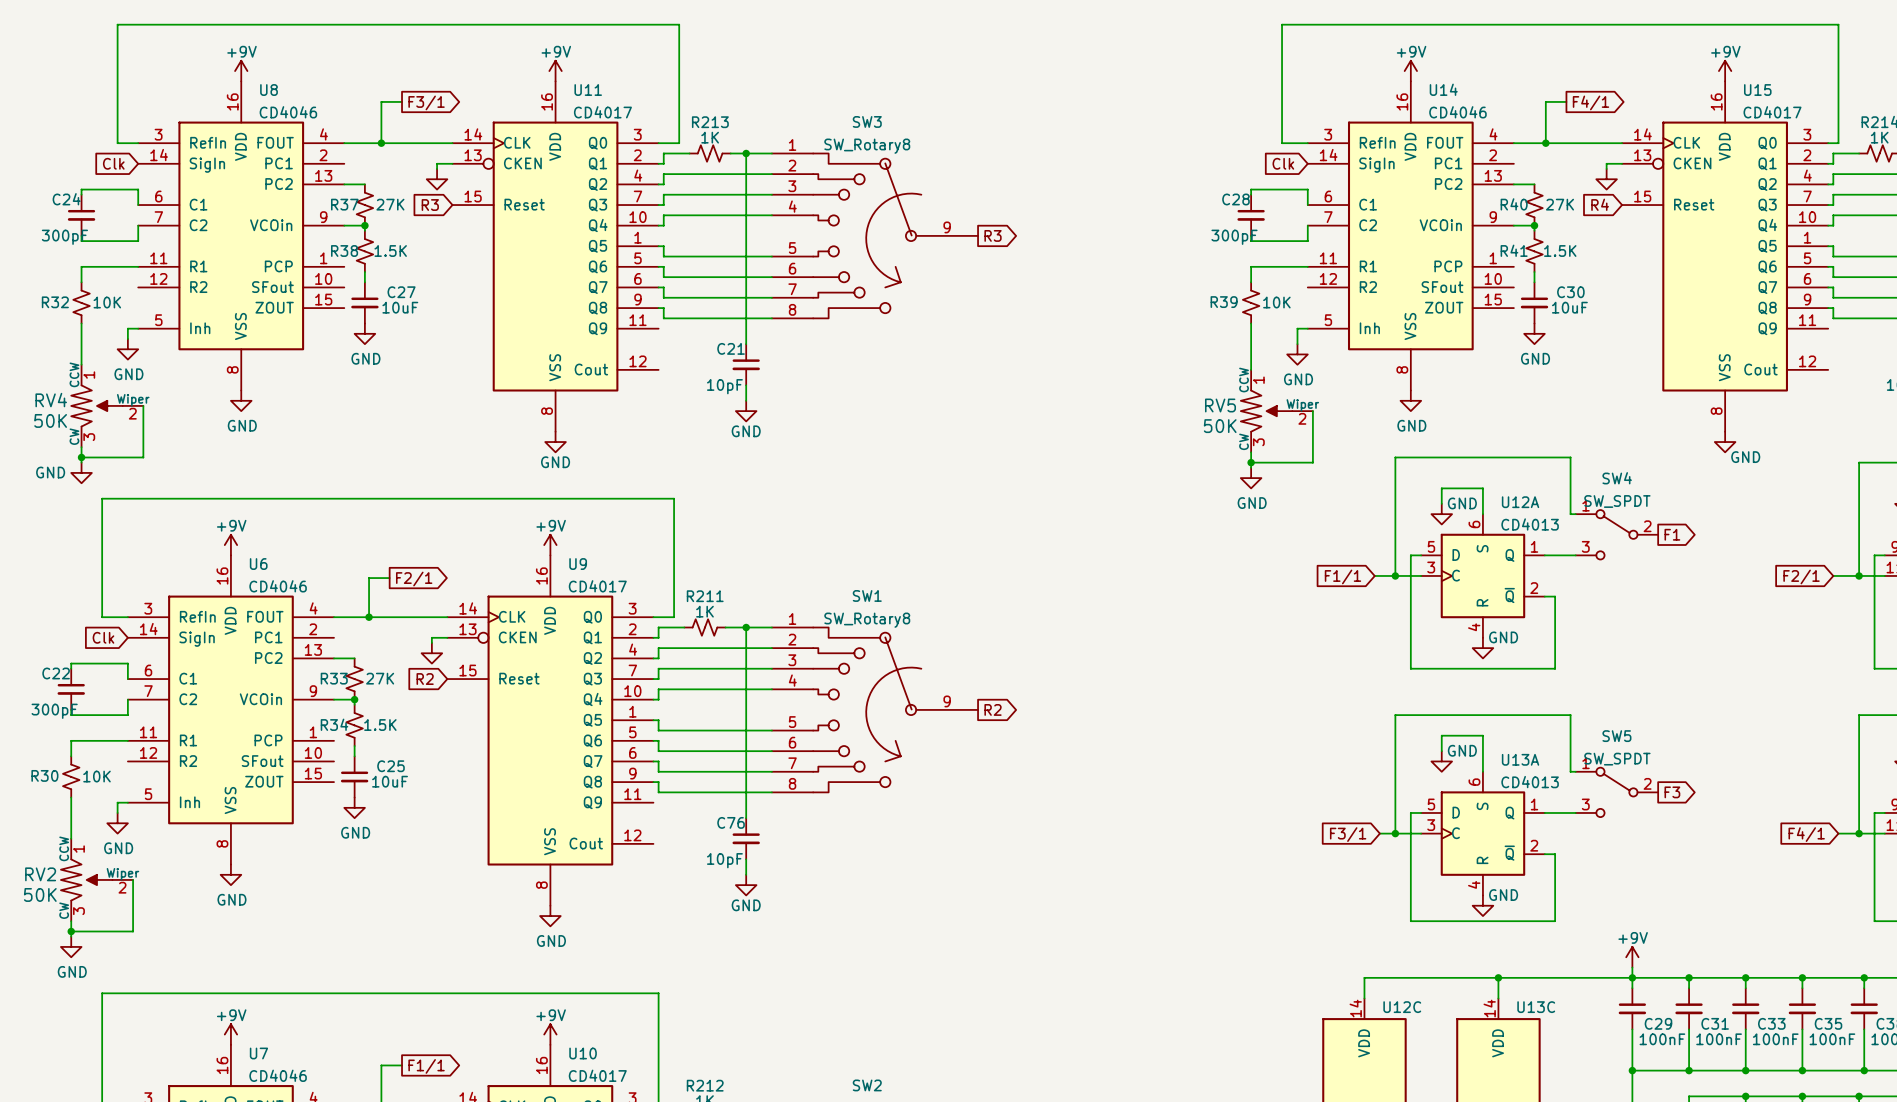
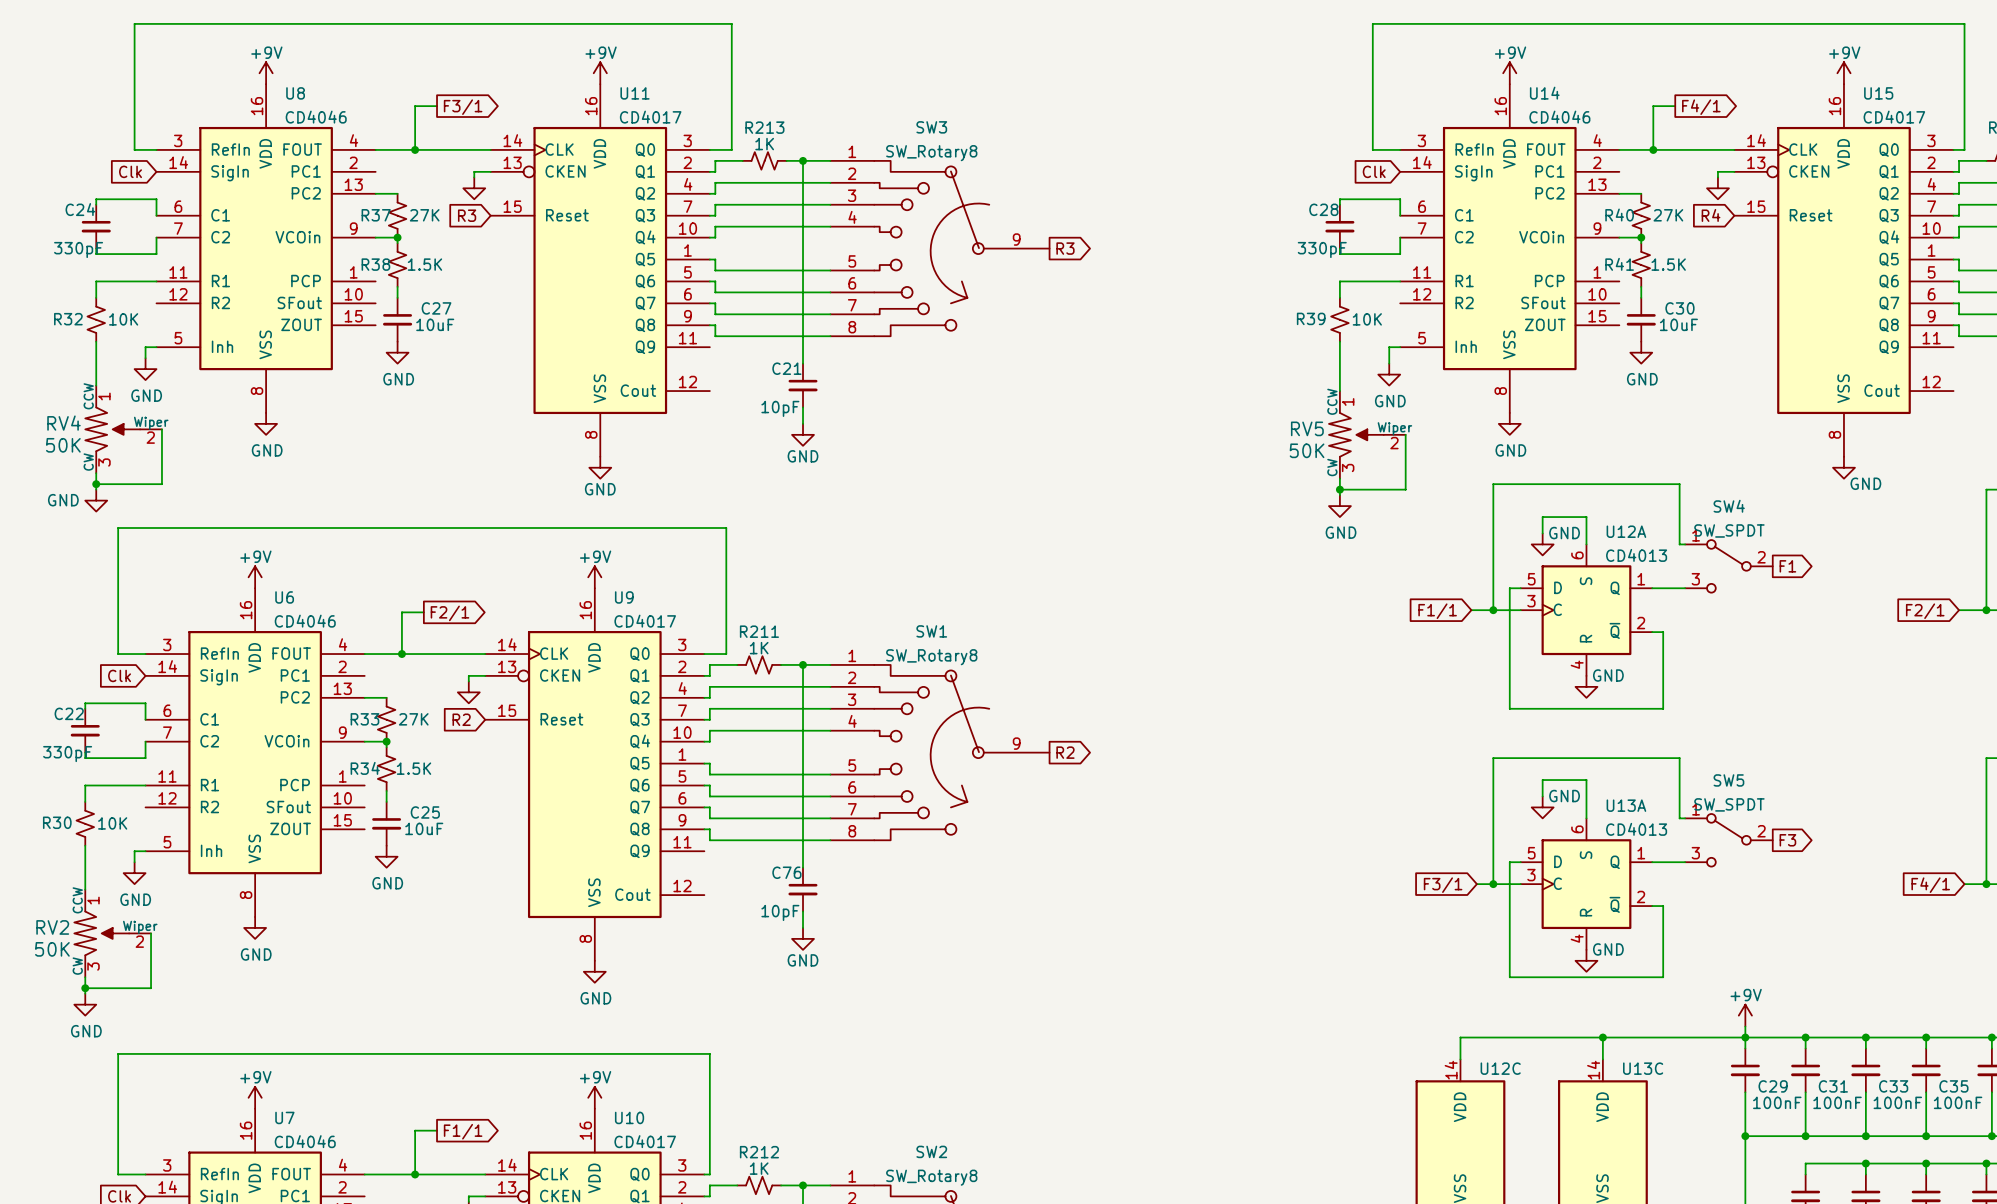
C24 value: 300pF (64, 237) -> 330pF (78, 249)
C28 value: 300pF (1234, 237) -> 330pF (1322, 249)
C22 value: 300pF (54, 711) -> 330pF (67, 754)

